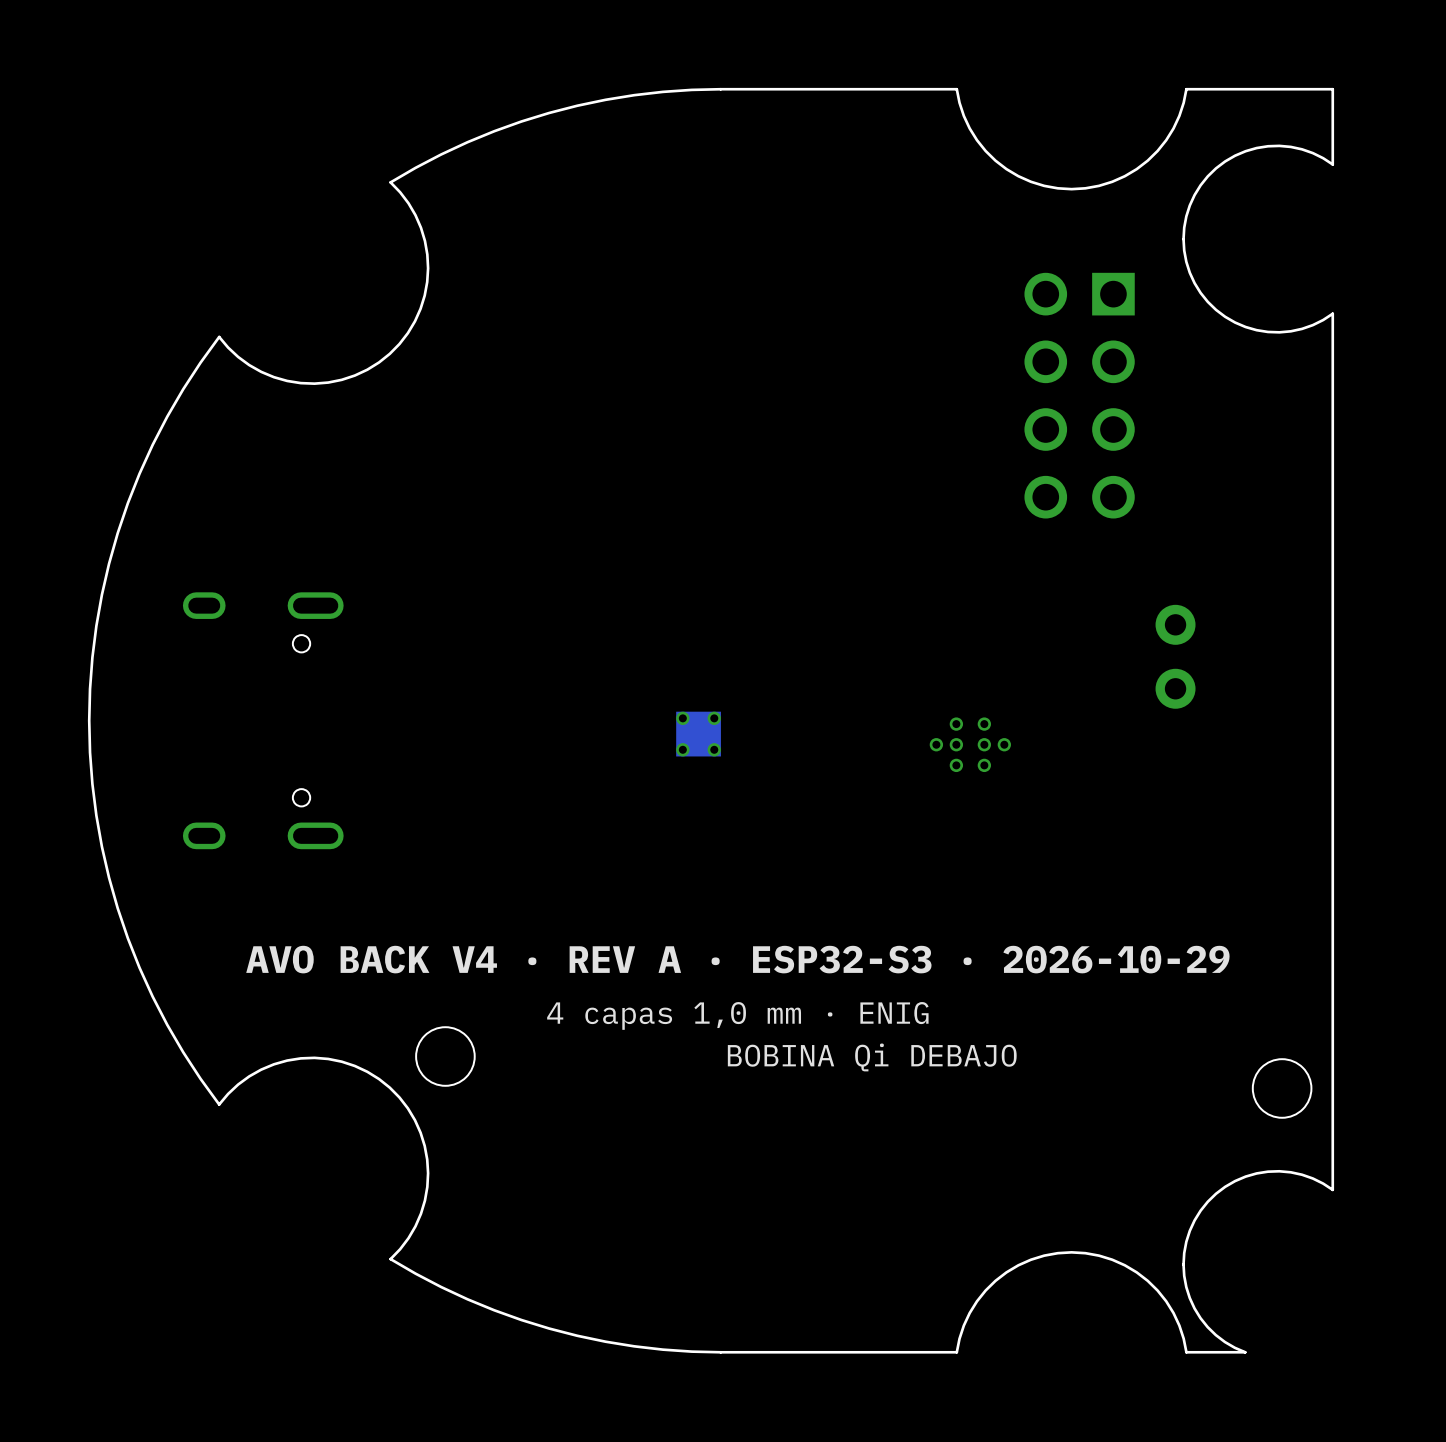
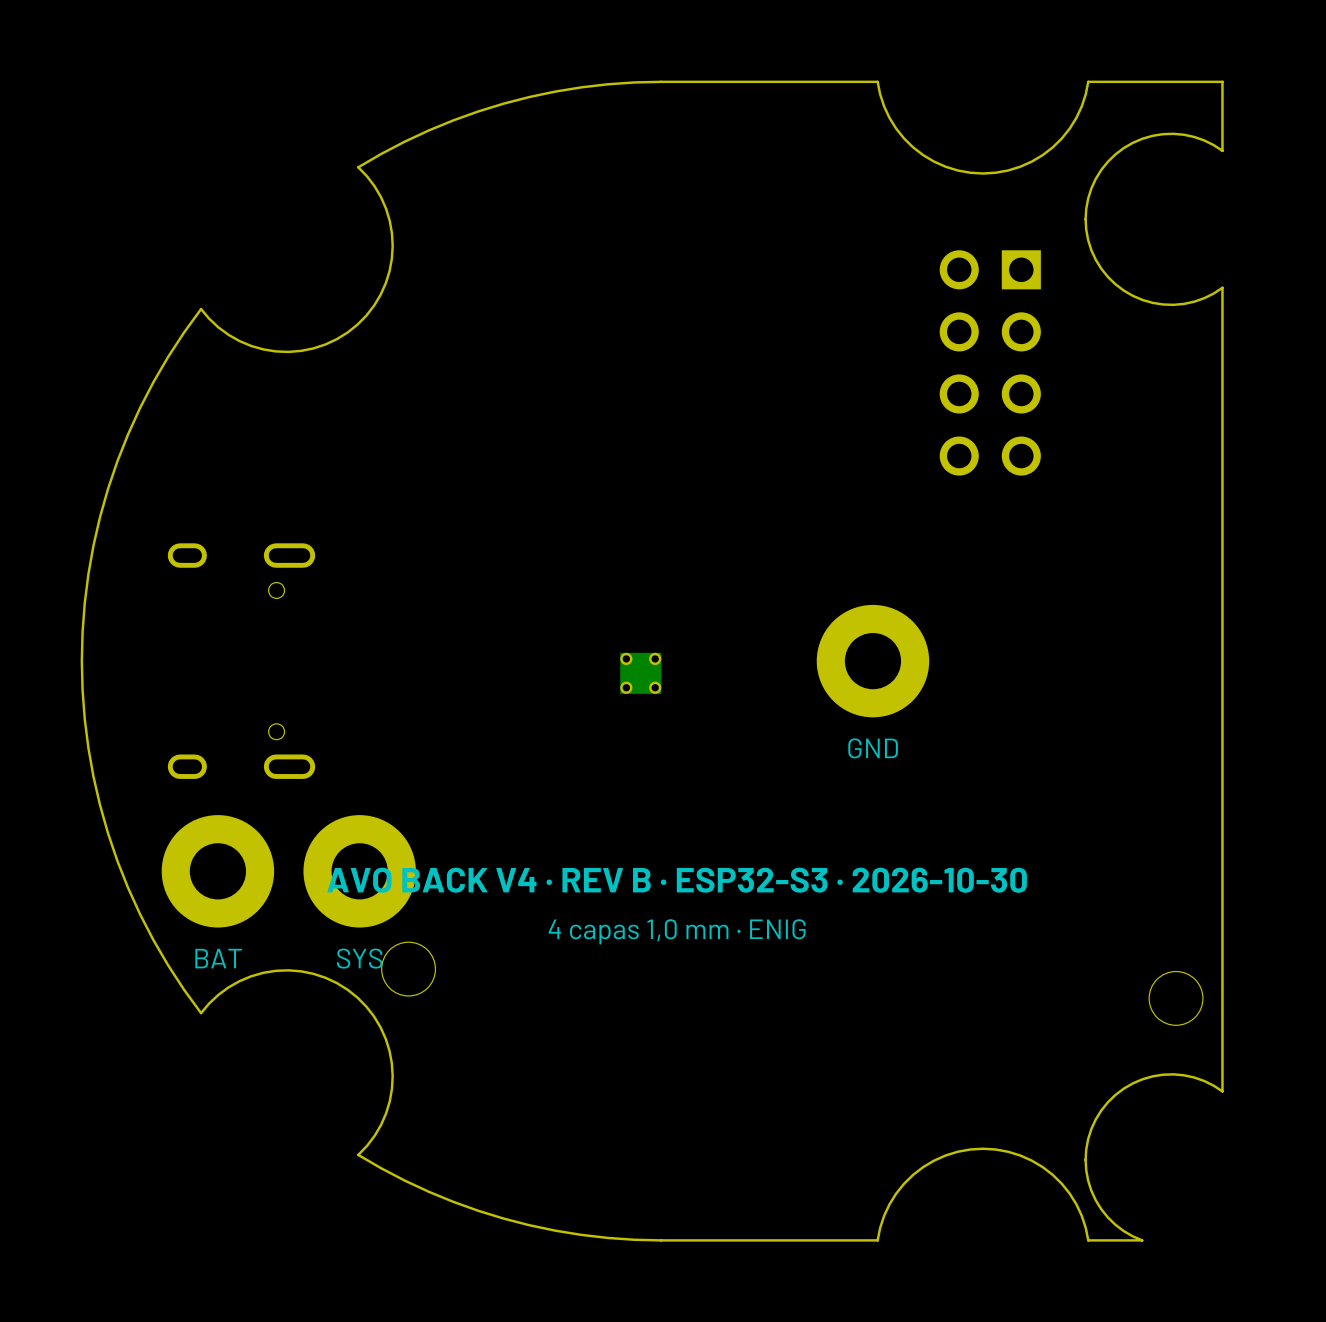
part: (1175, 624) -> none
part: (1175, 688) -> none
part: none -> (872, 661)
part: (970, 744) -> none
text: none -> GND (873, 748)
part: none -> (217, 871)
part: none -> (359, 871)
text: AVO BACK V4 · REV A · ESP32-S3 · 2026-10-29 (737, 959) -> AVO BACK V4 · REV B · ESP32-S3 · 2026-10-30 (677, 880)
text: none -> BAT (218, 958)
text: none -> SYS (359, 958)
text: BOBINA Qi DEBAJO (872, 1057) -> none

